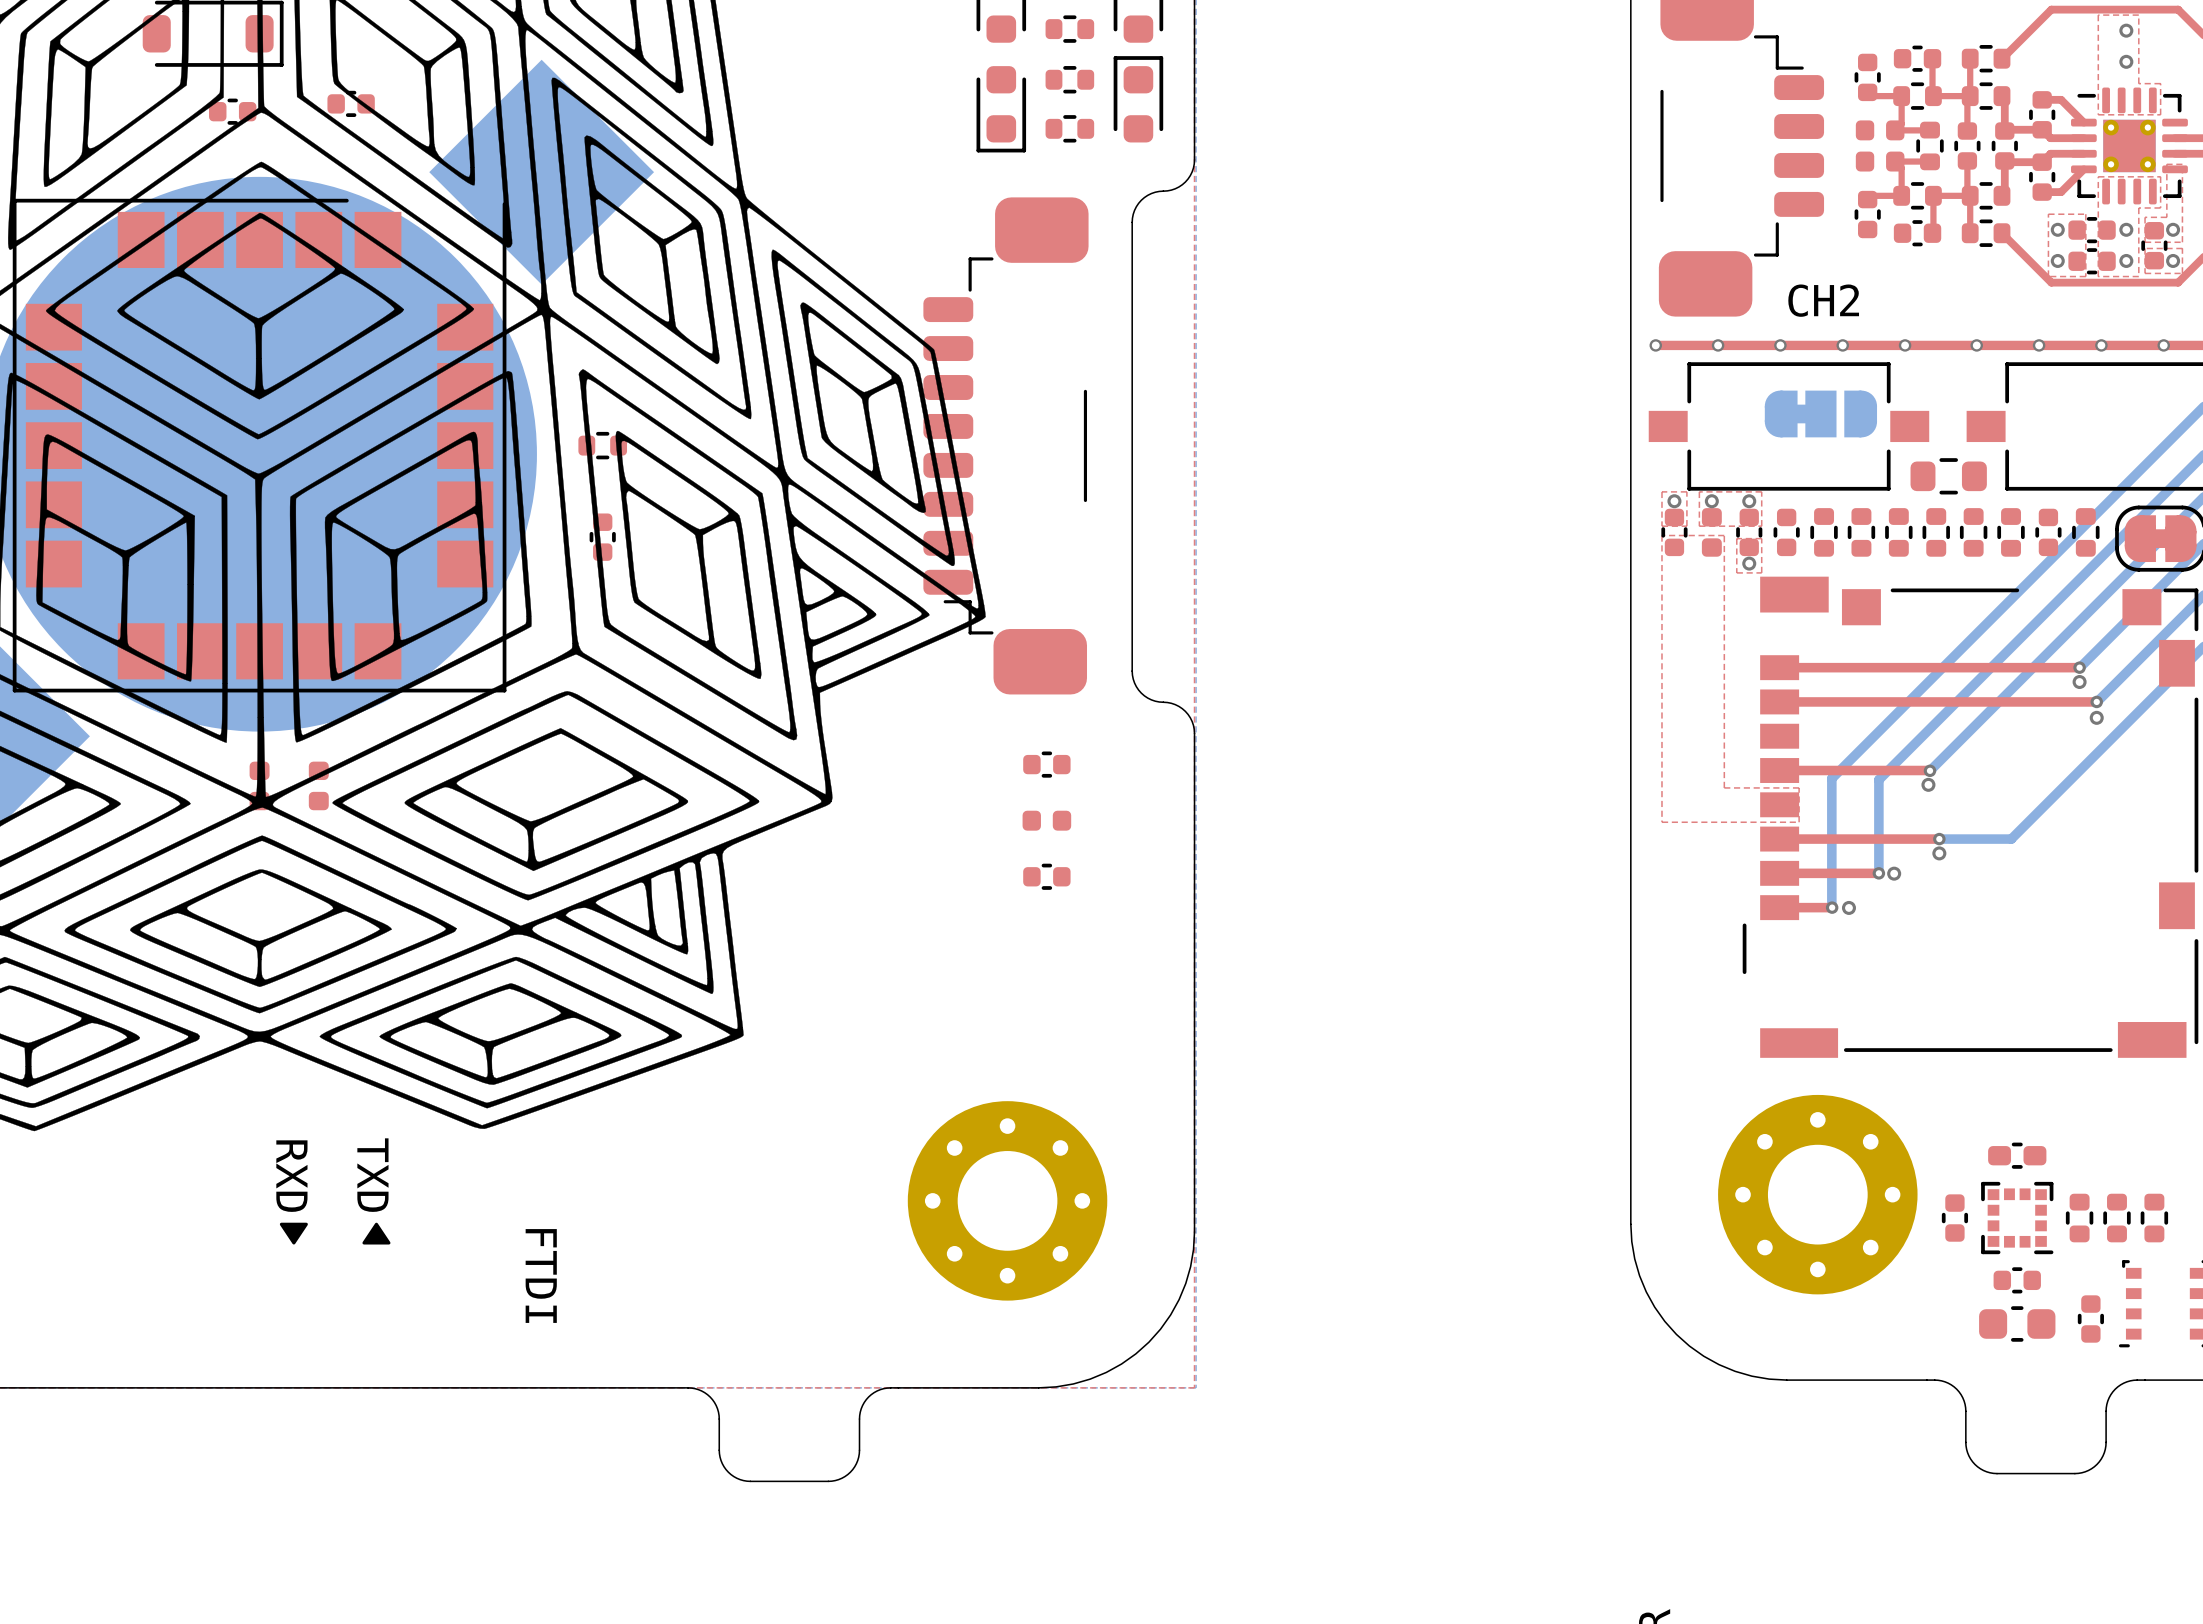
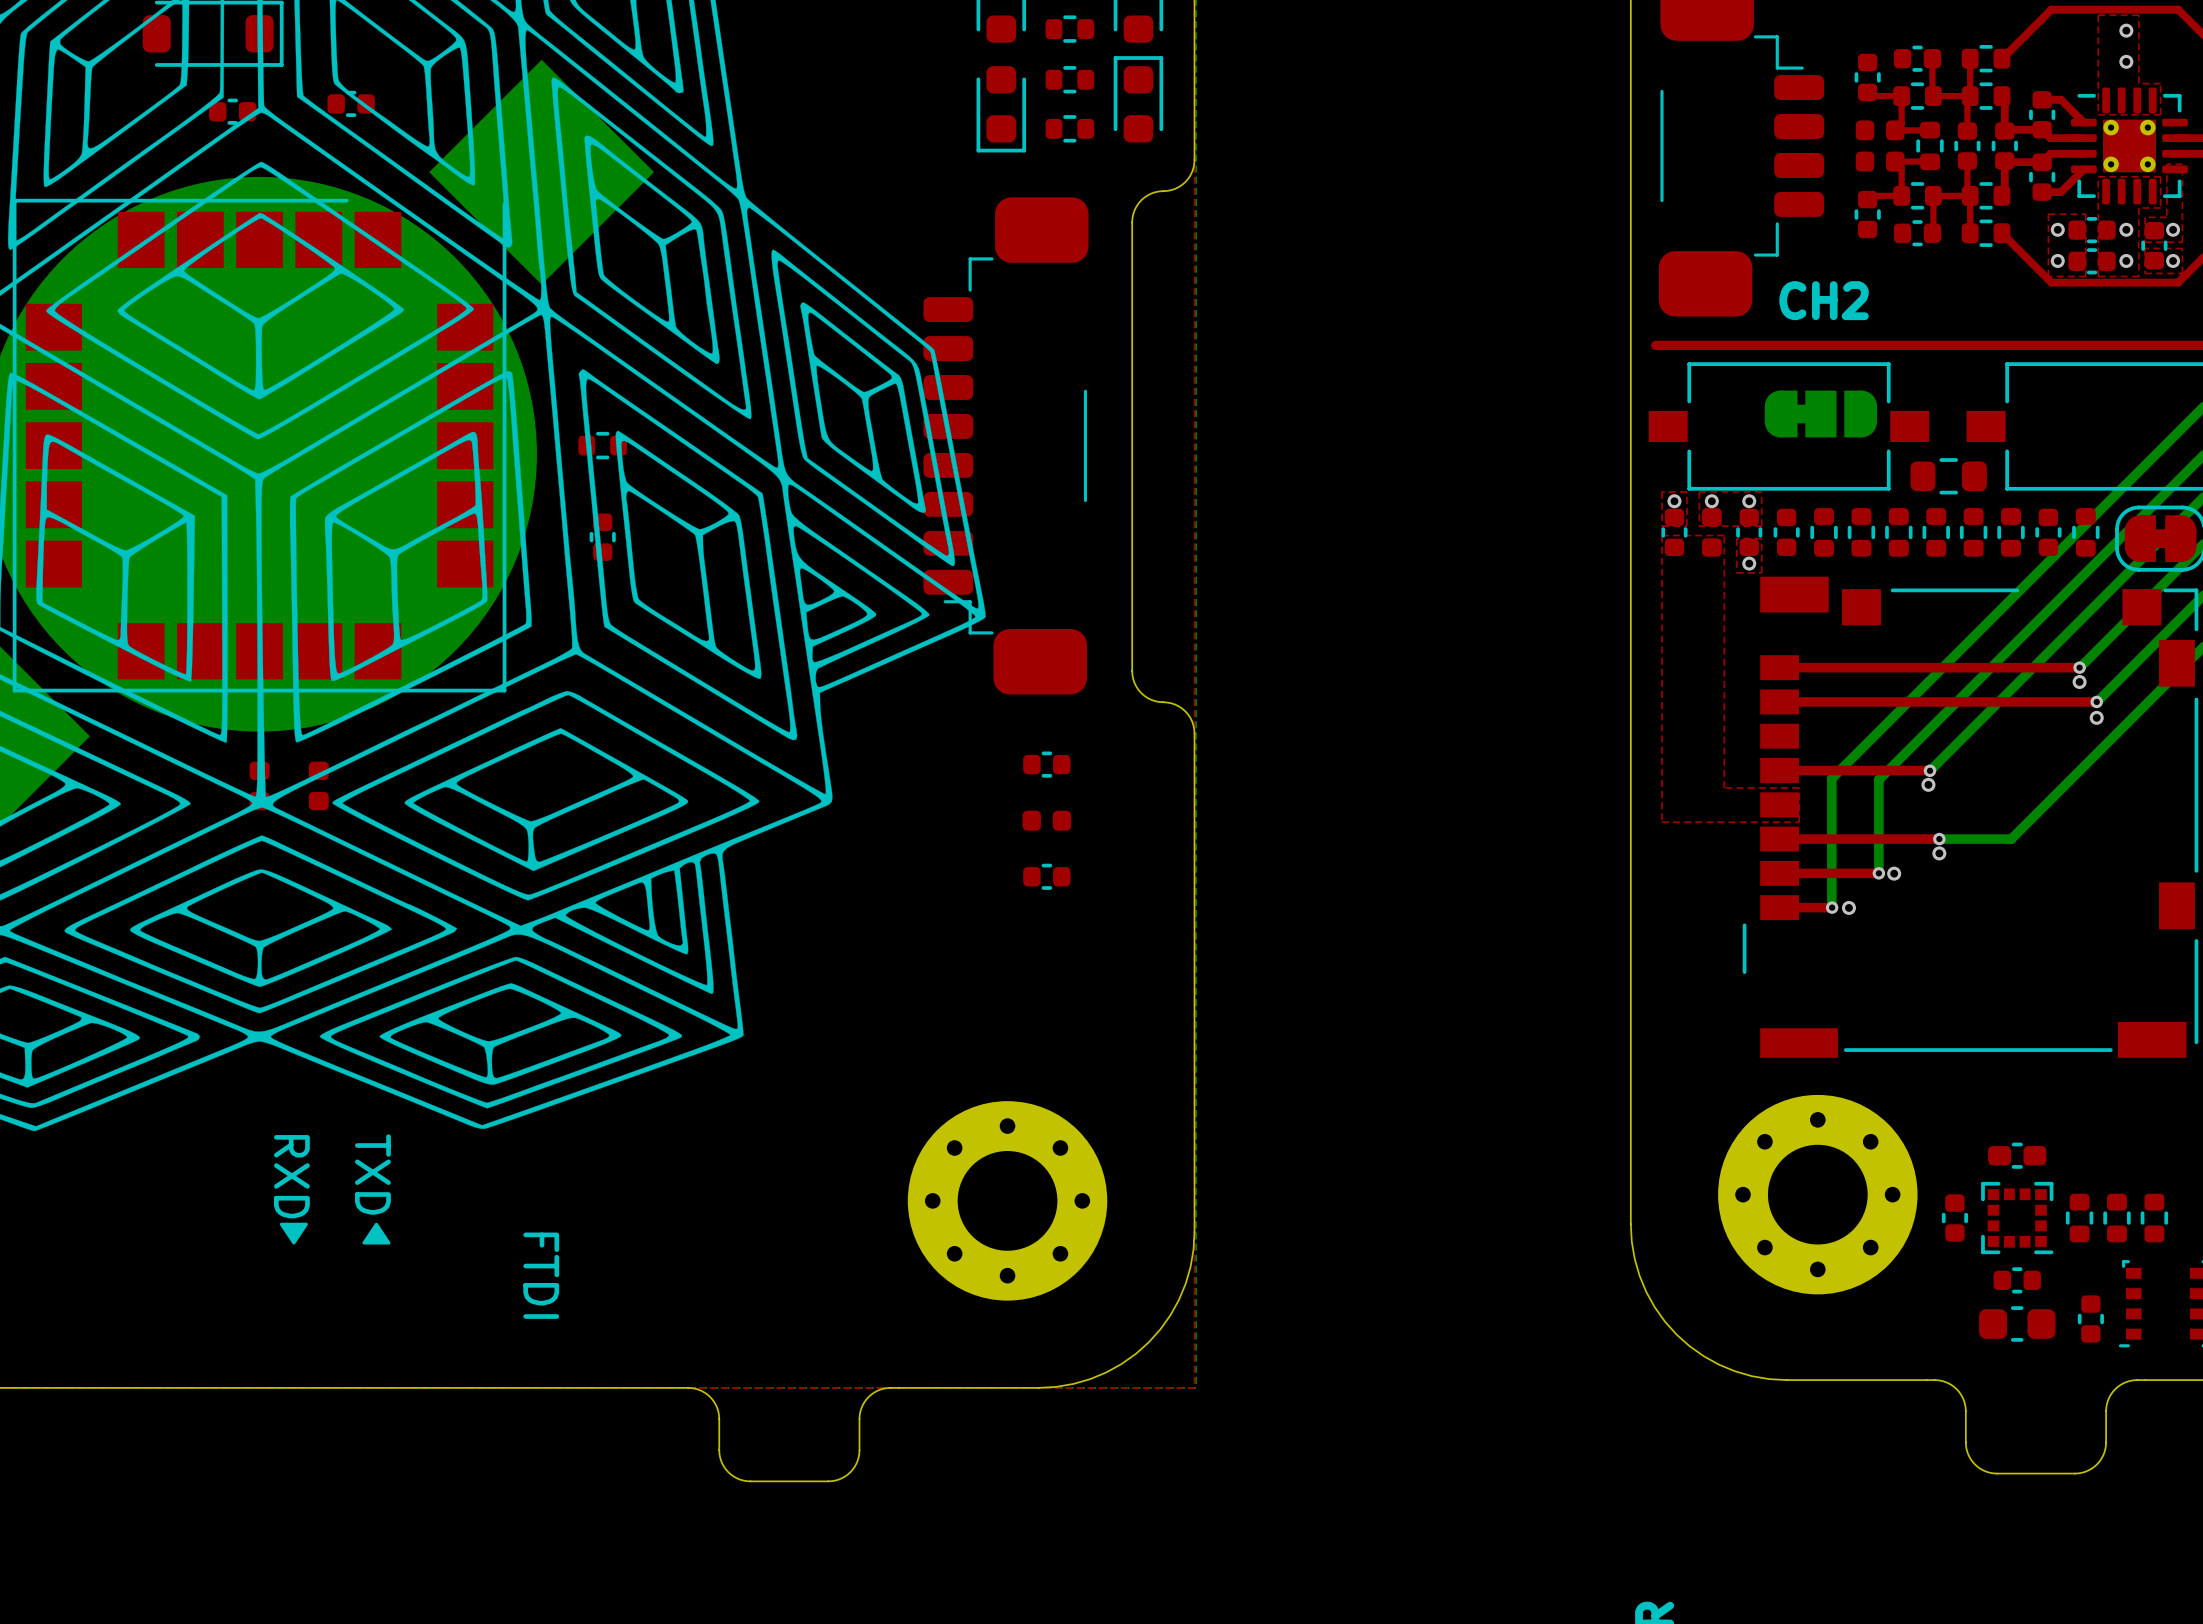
via: (1655, 345) -> none
via: (1718, 345) -> none
via: (1780, 345) -> none
via: (1842, 345) -> none
via: (1905, 345) -> none
via: (1976, 345) -> none
via: (2039, 345) -> none
via: (2101, 345) -> none
via: (2163, 345) -> none

